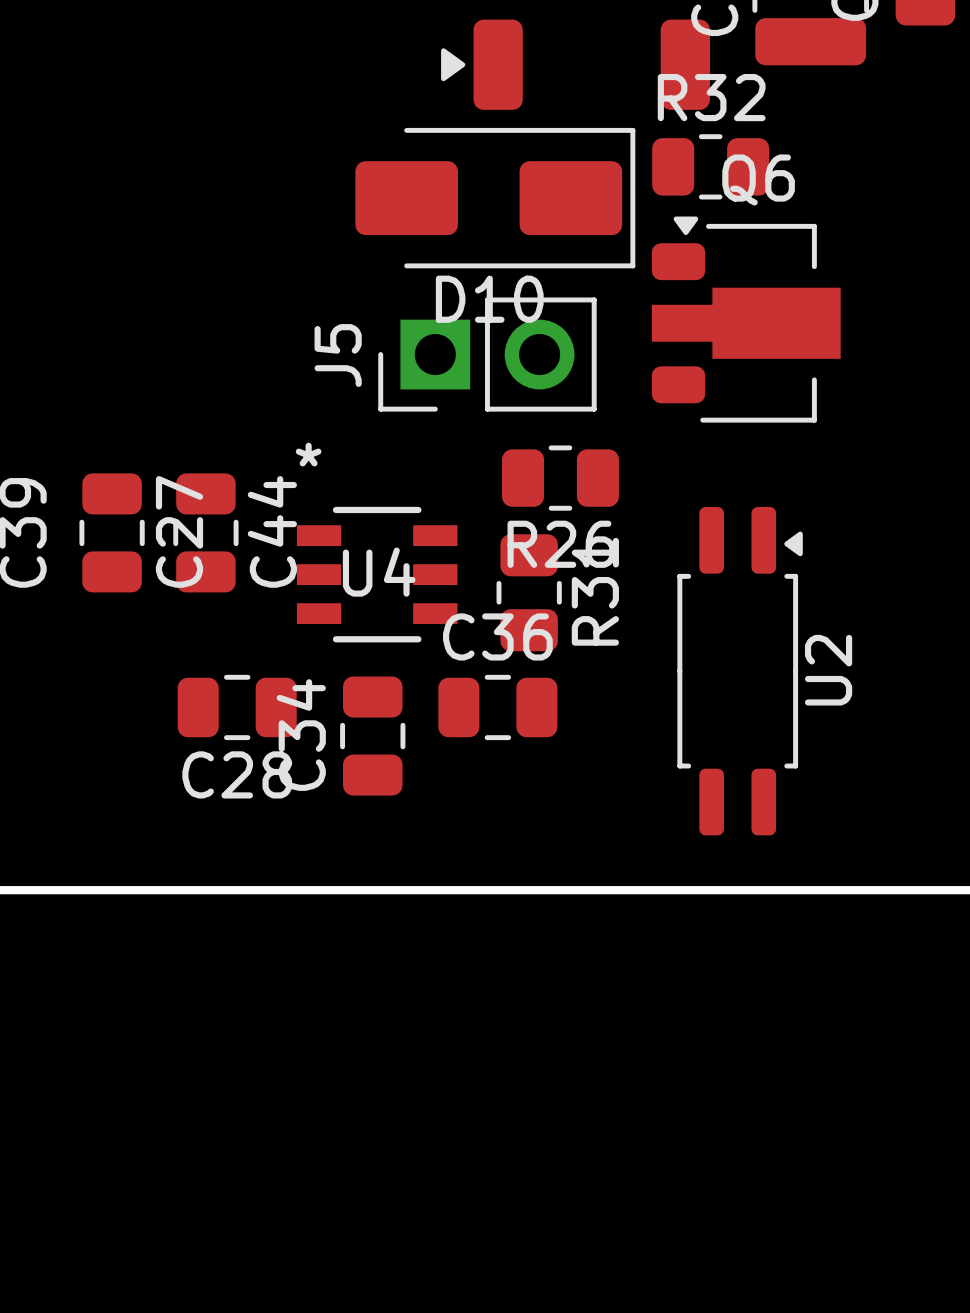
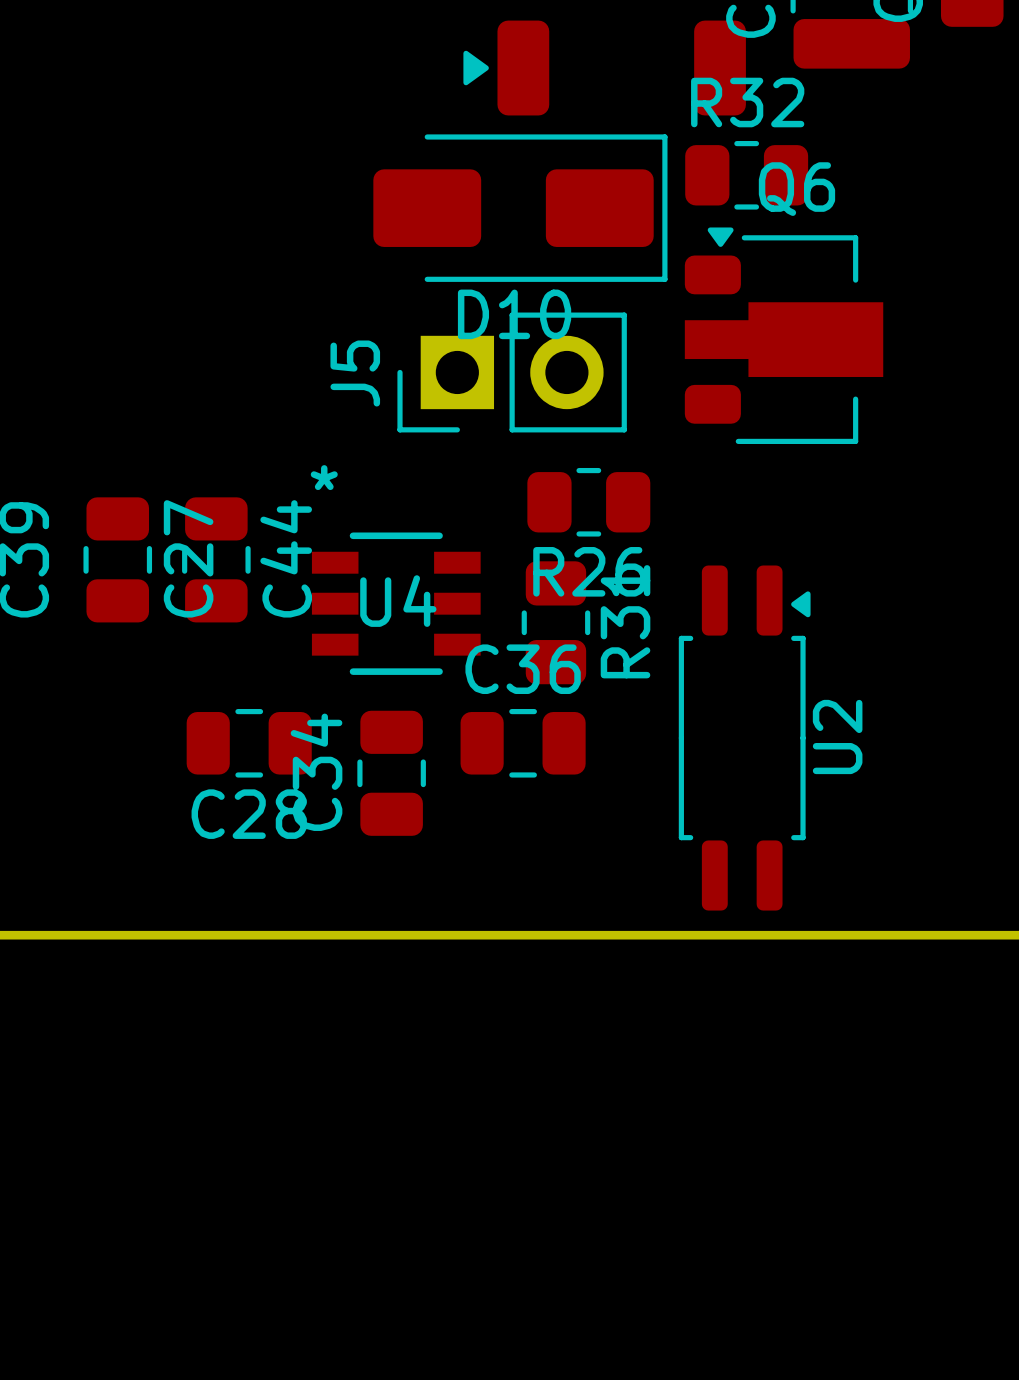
U2 position: (740, 671) -> (744, 738)

